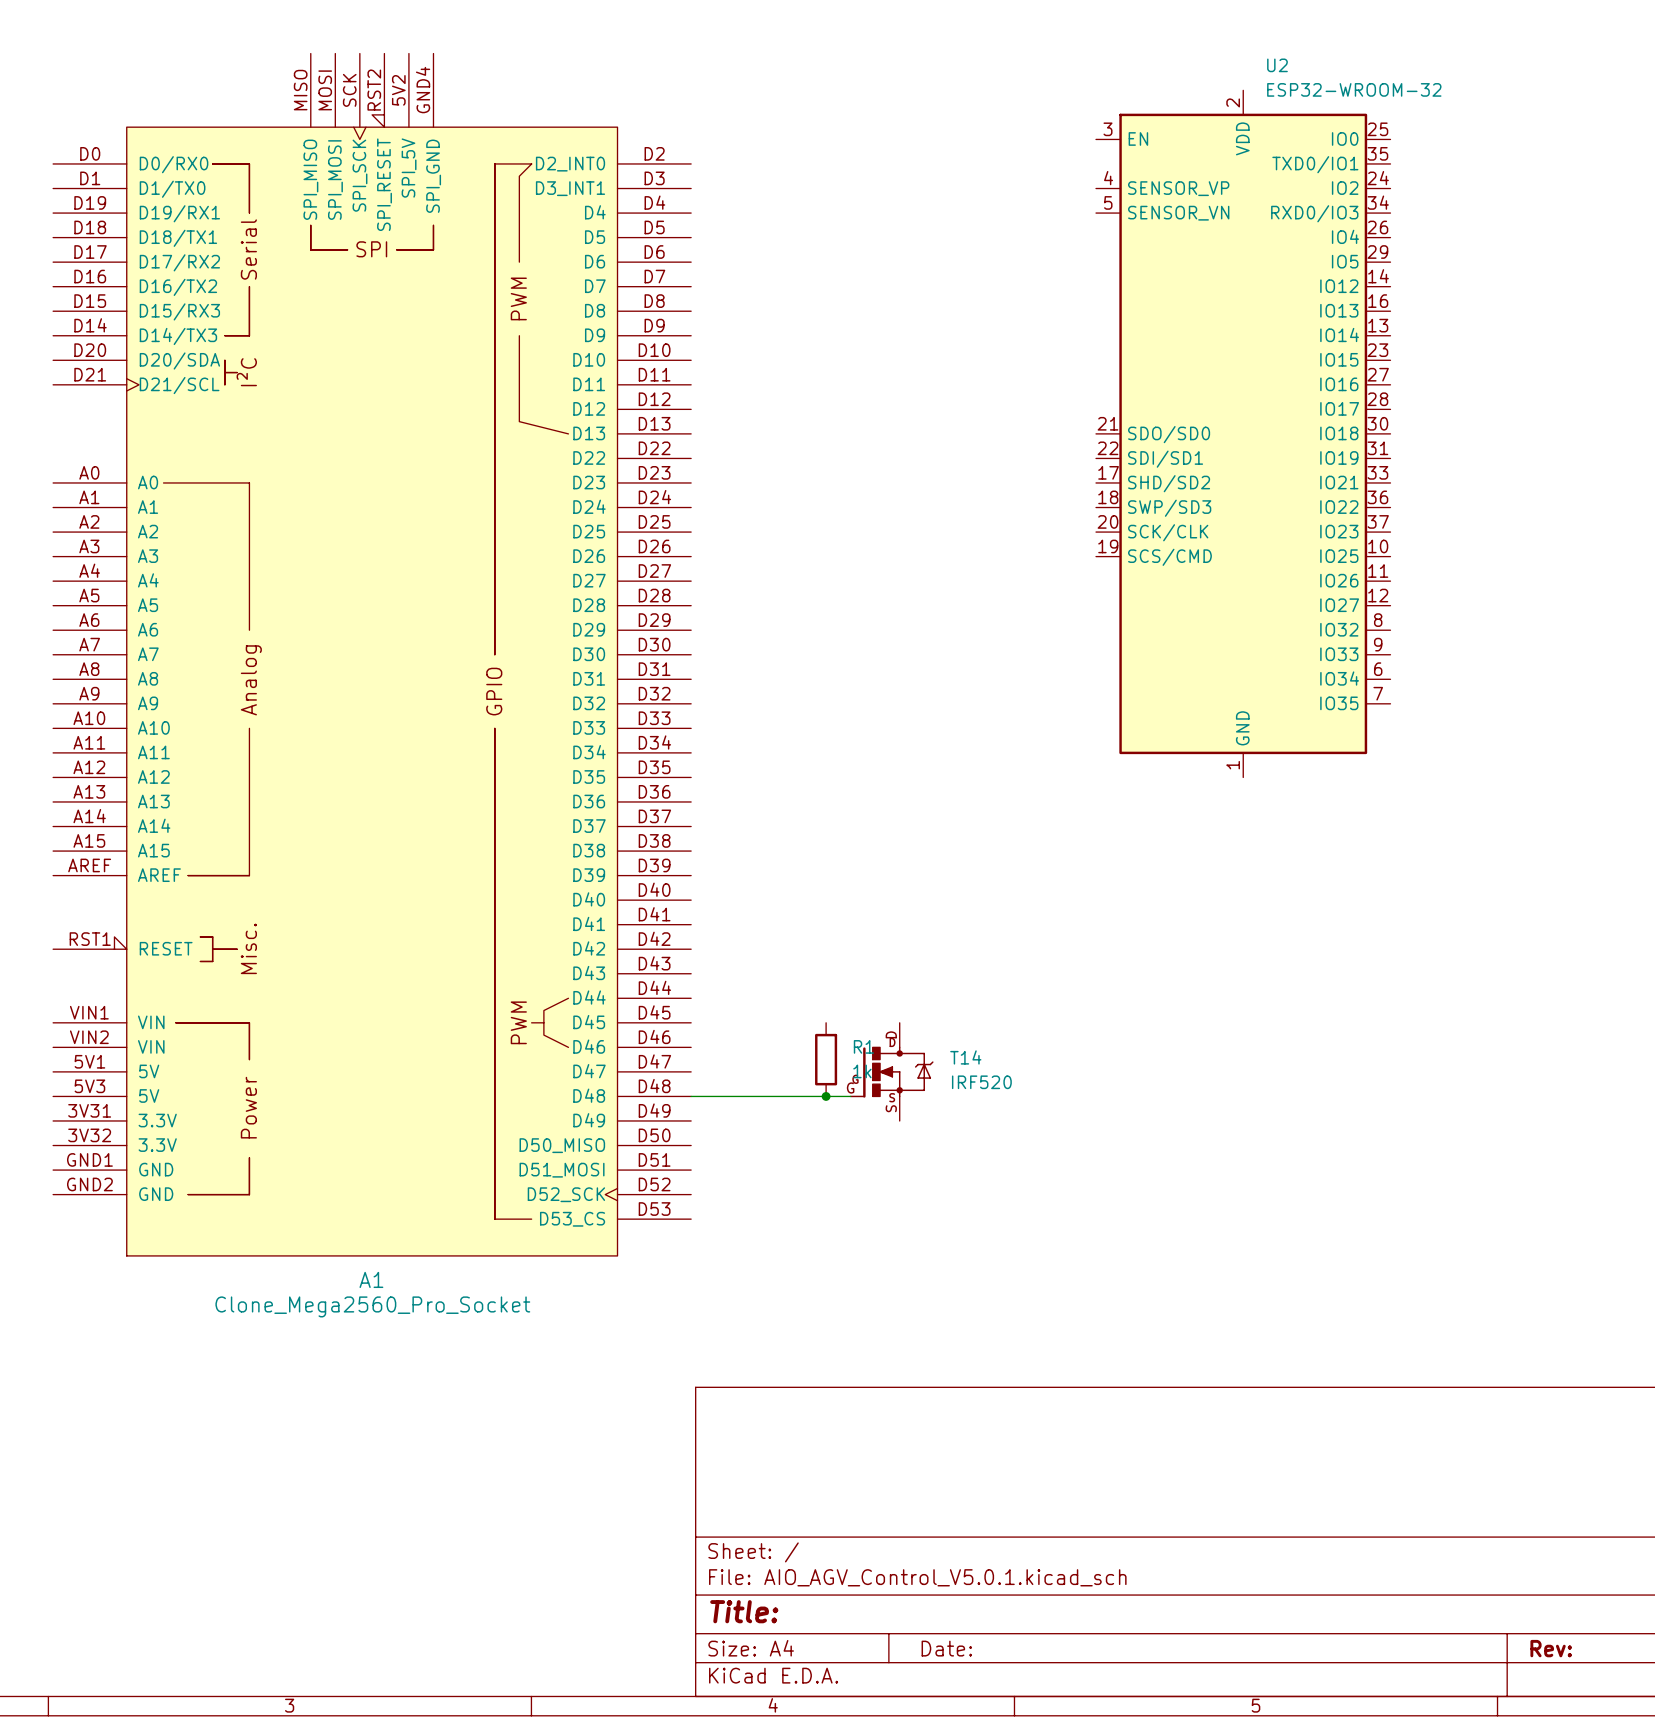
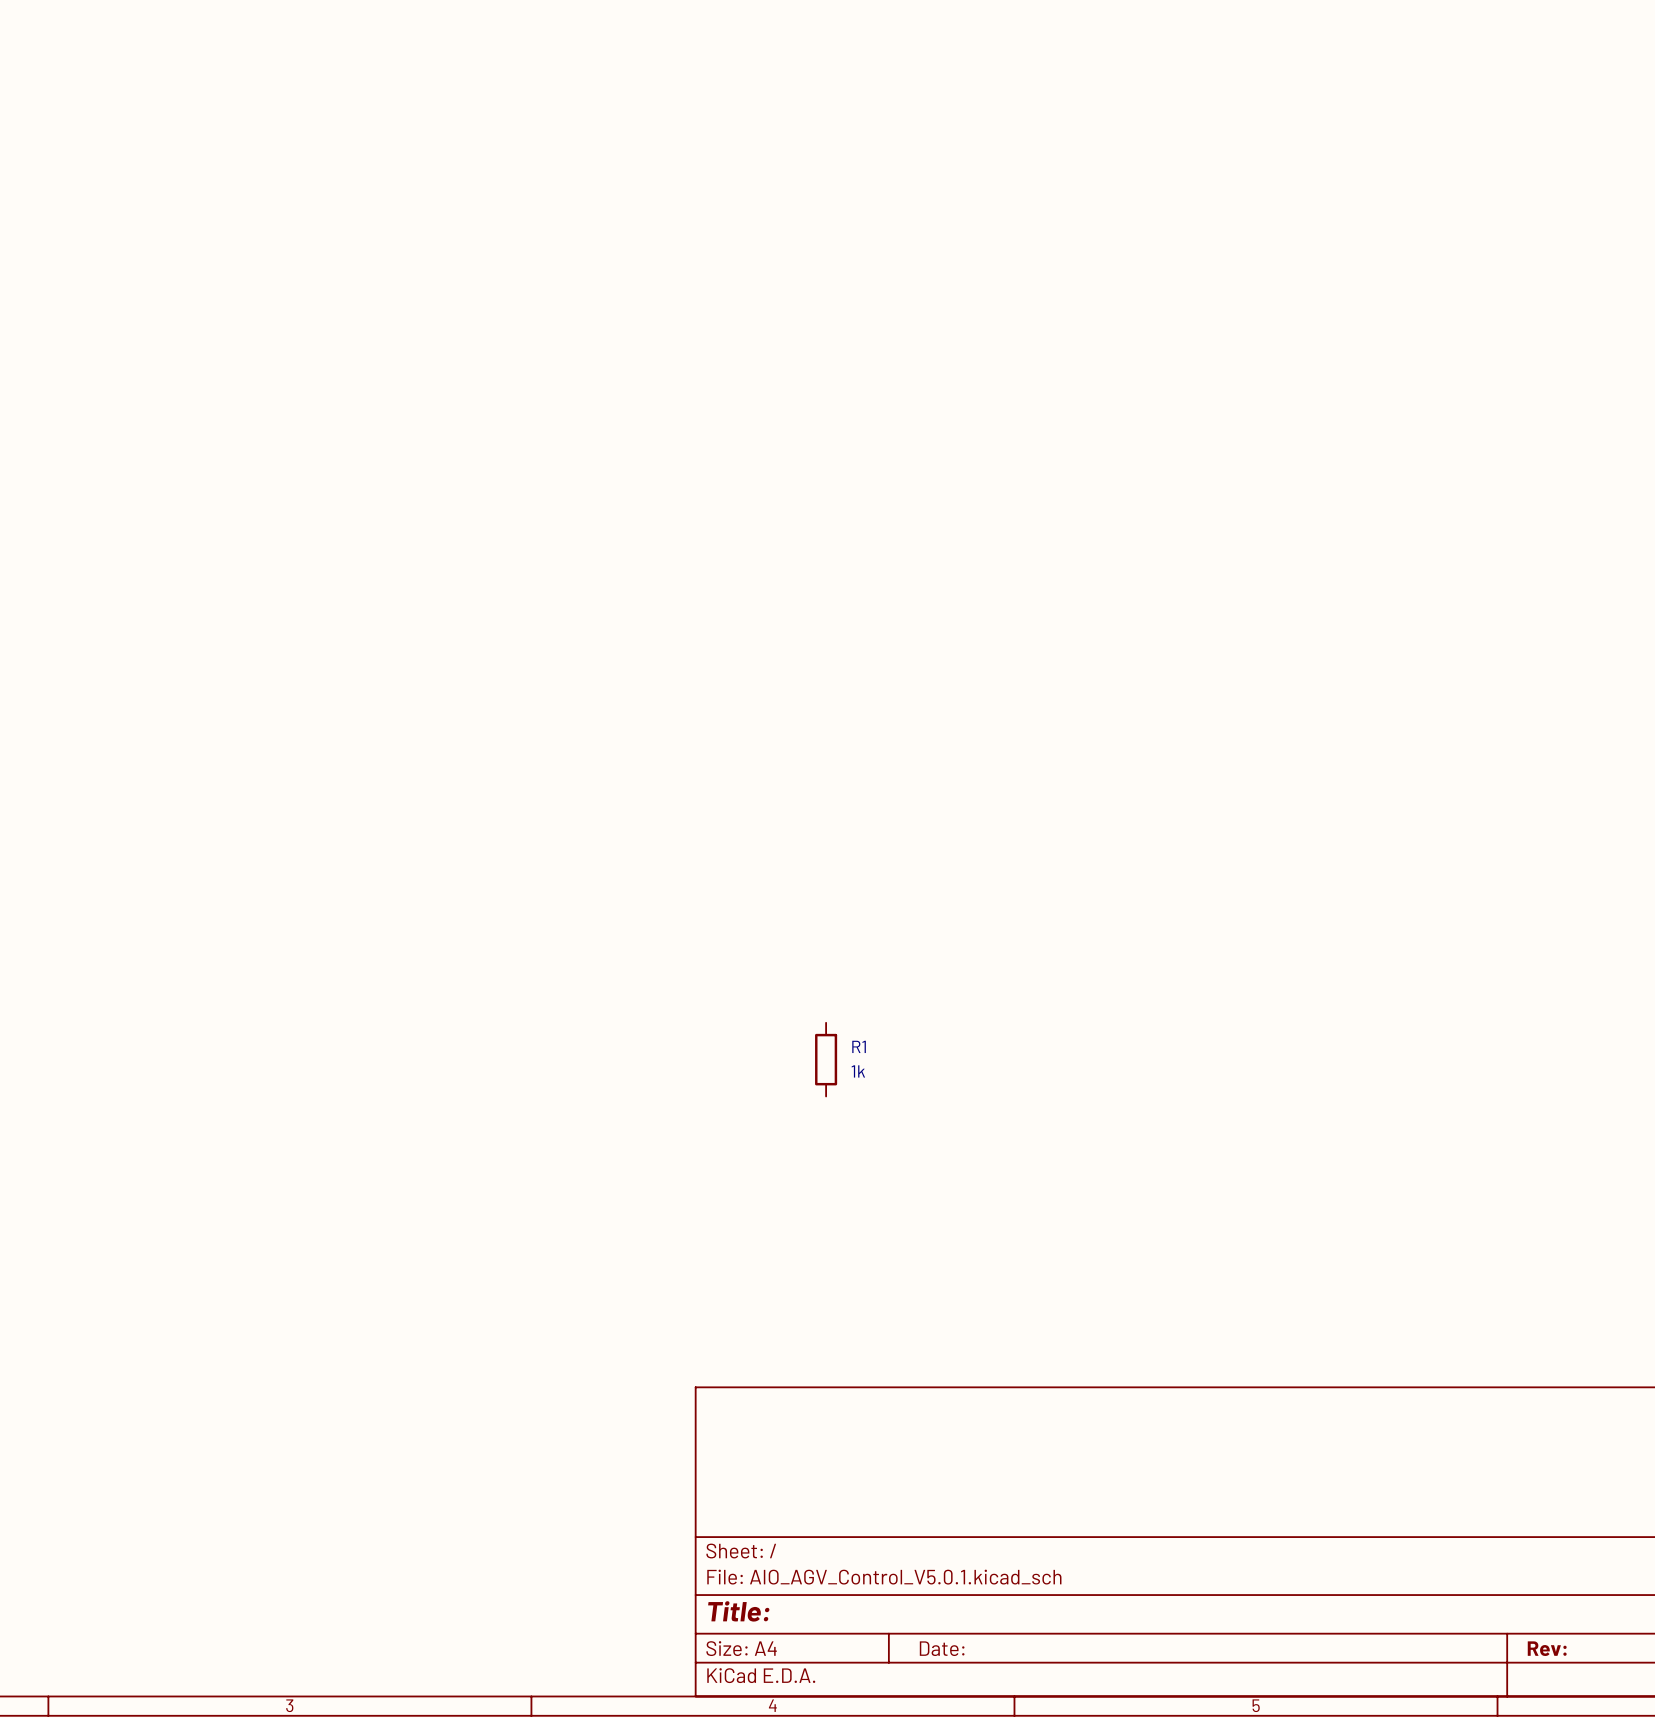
U2: ESP32-WROOM-32 (1243, 433) -> none
A1: Clone_Mega2560_Pro_Socket (372, 654) -> none
T14: IRF520 (891, 1071) -> none
wire: (691, 1096) (850, 1096) -> none
junction: (826, 1096) -> none

